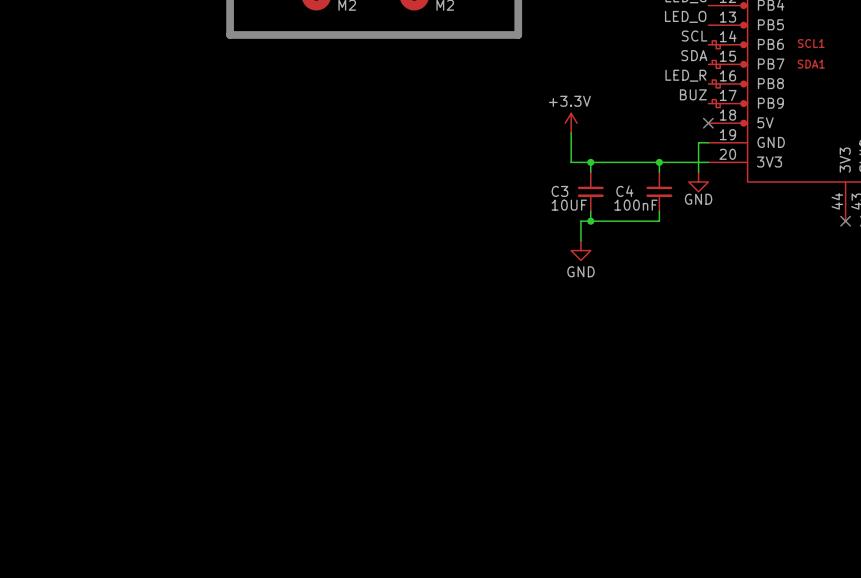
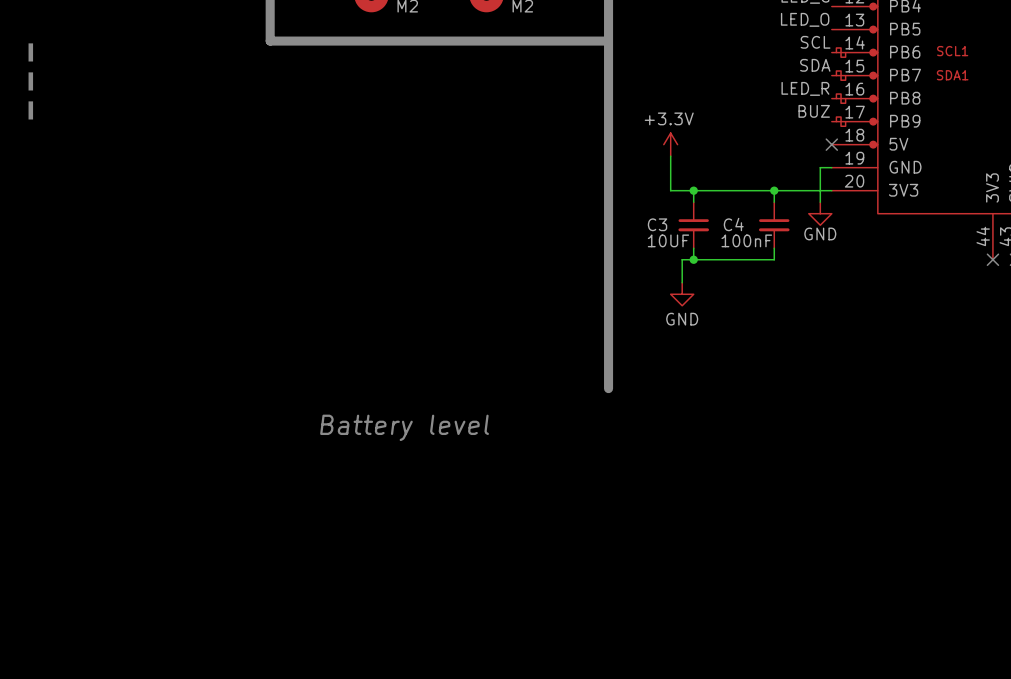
line: none -> (608, 41) (608, 388)
line: none -> (30, 43) (30, 121)
text: none -> Battery level (404, 427)

